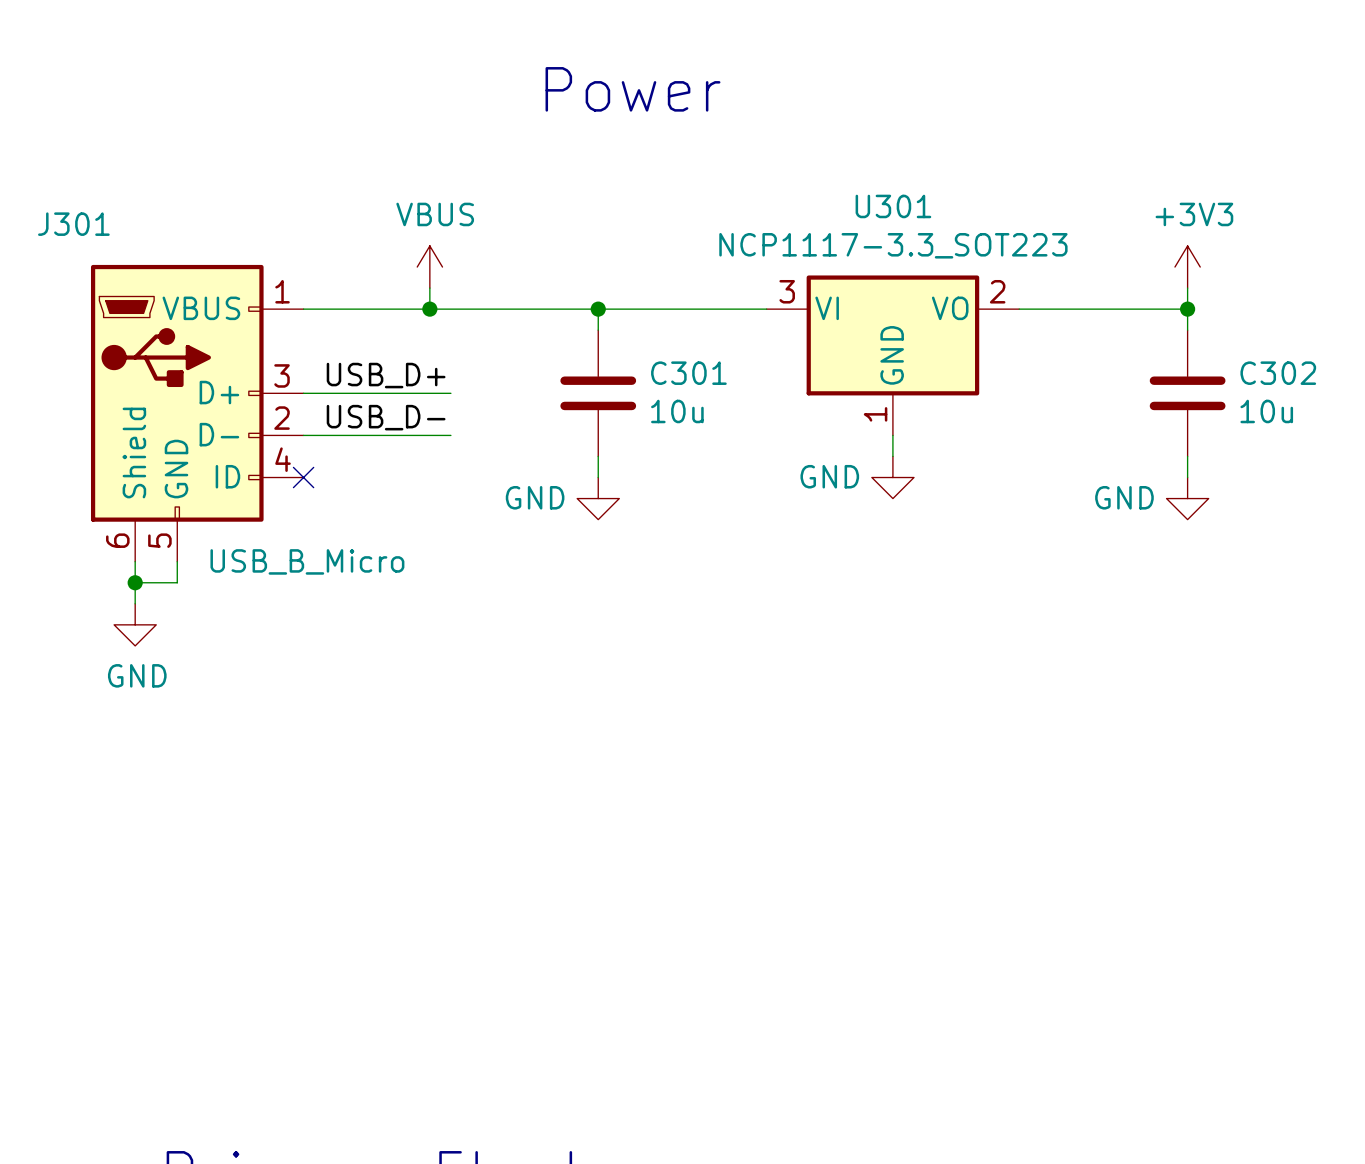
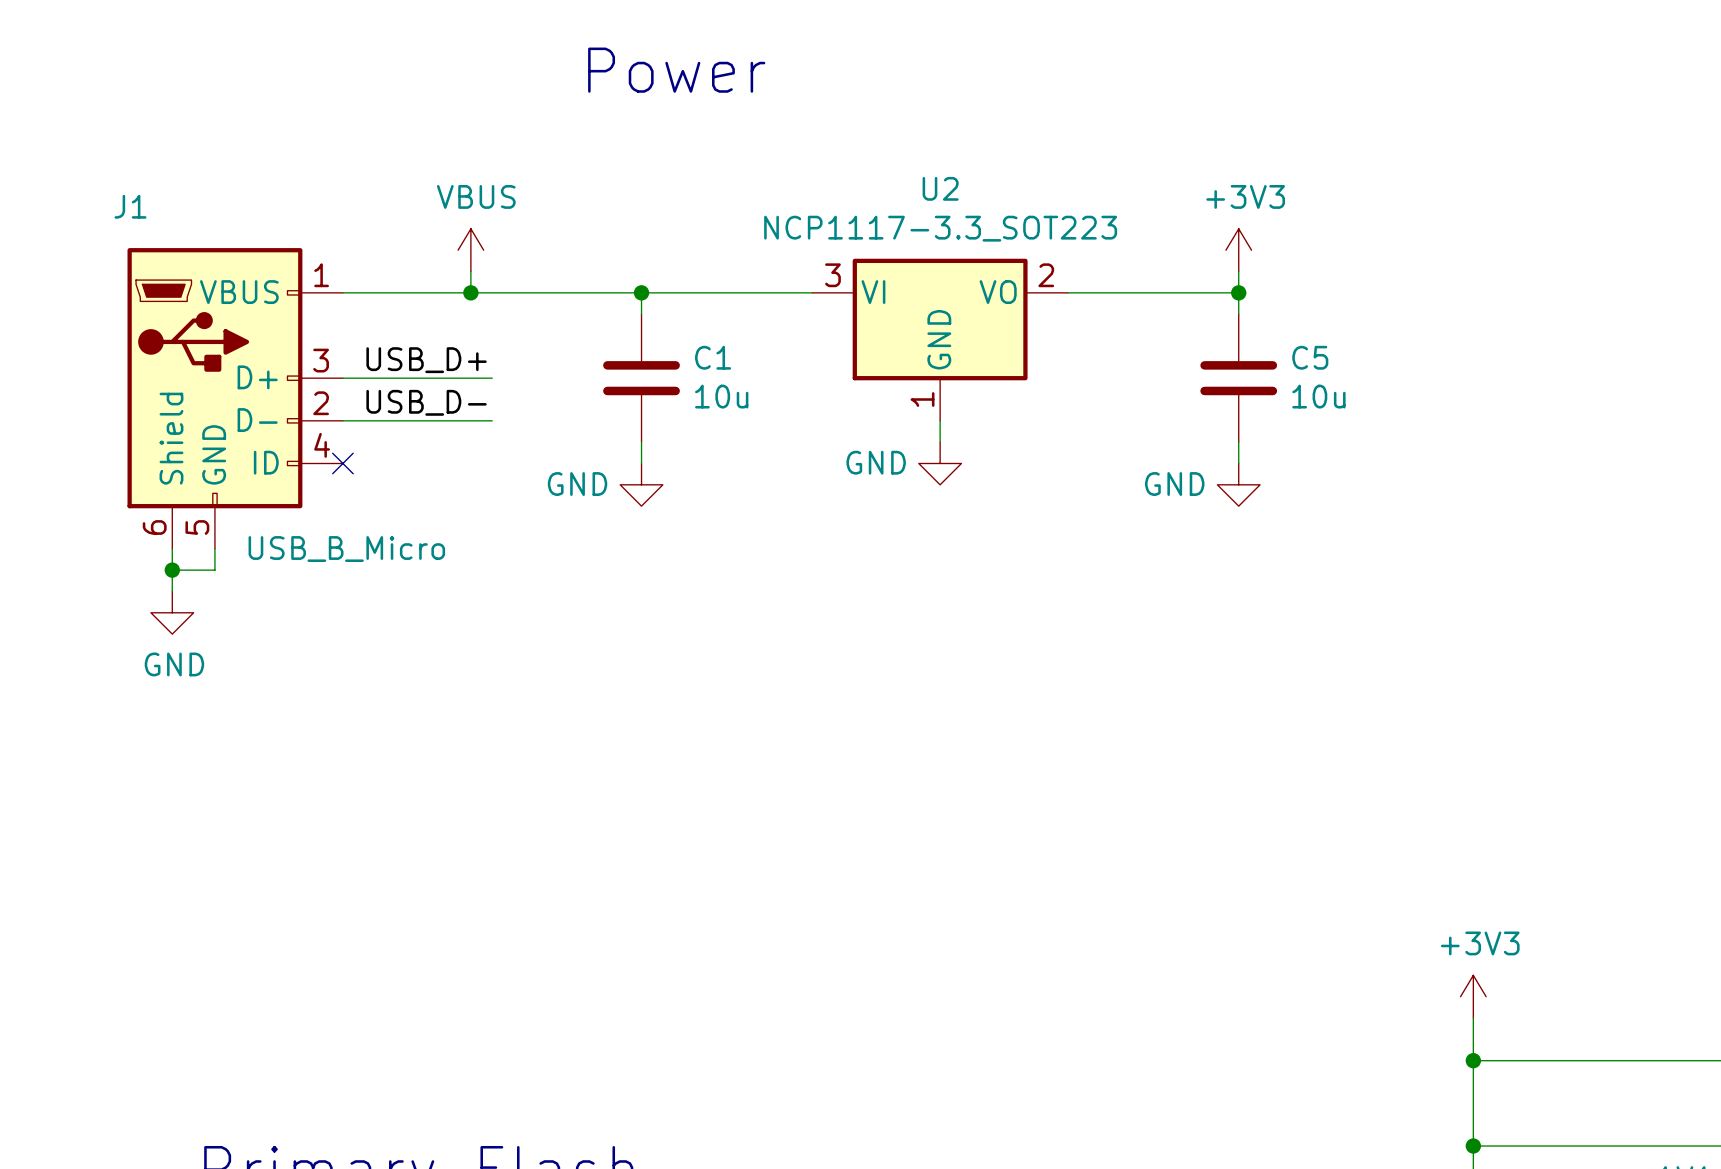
U301 name: U301 (893, 206) -> U2 (940, 188)
J301 name: J301 (73, 224) -> J1 (130, 206)
C301 name: C301 (688, 373) -> C1 (713, 357)
C302 name: C302 (1278, 373) -> C5 (1310, 357)

